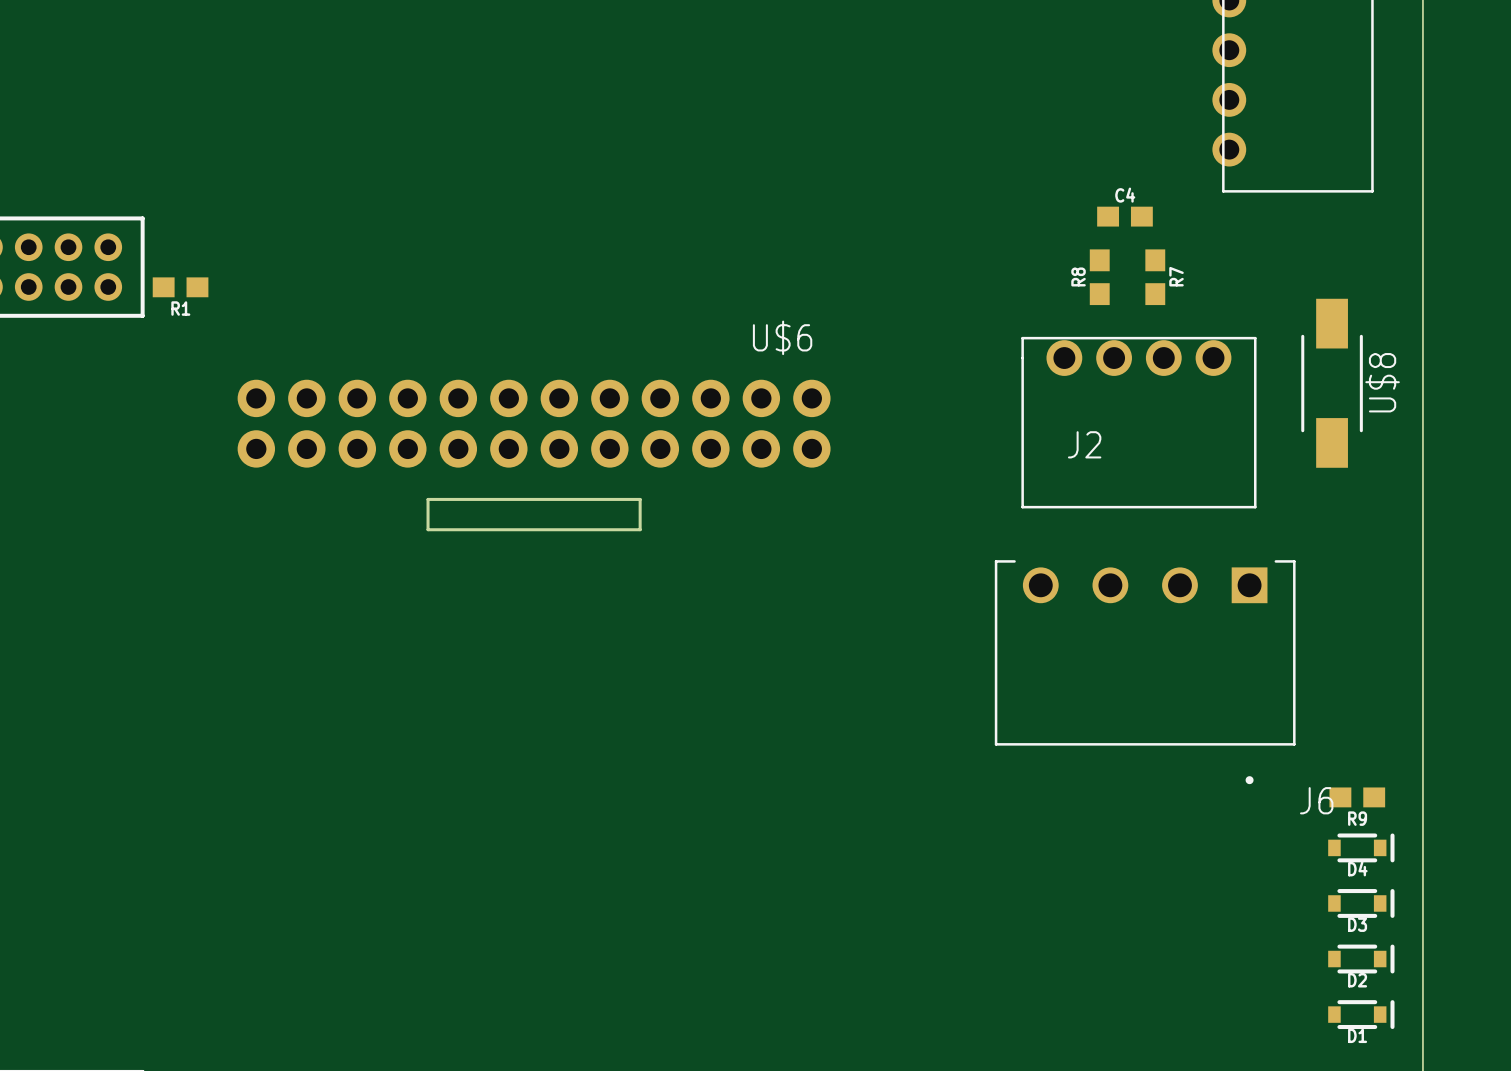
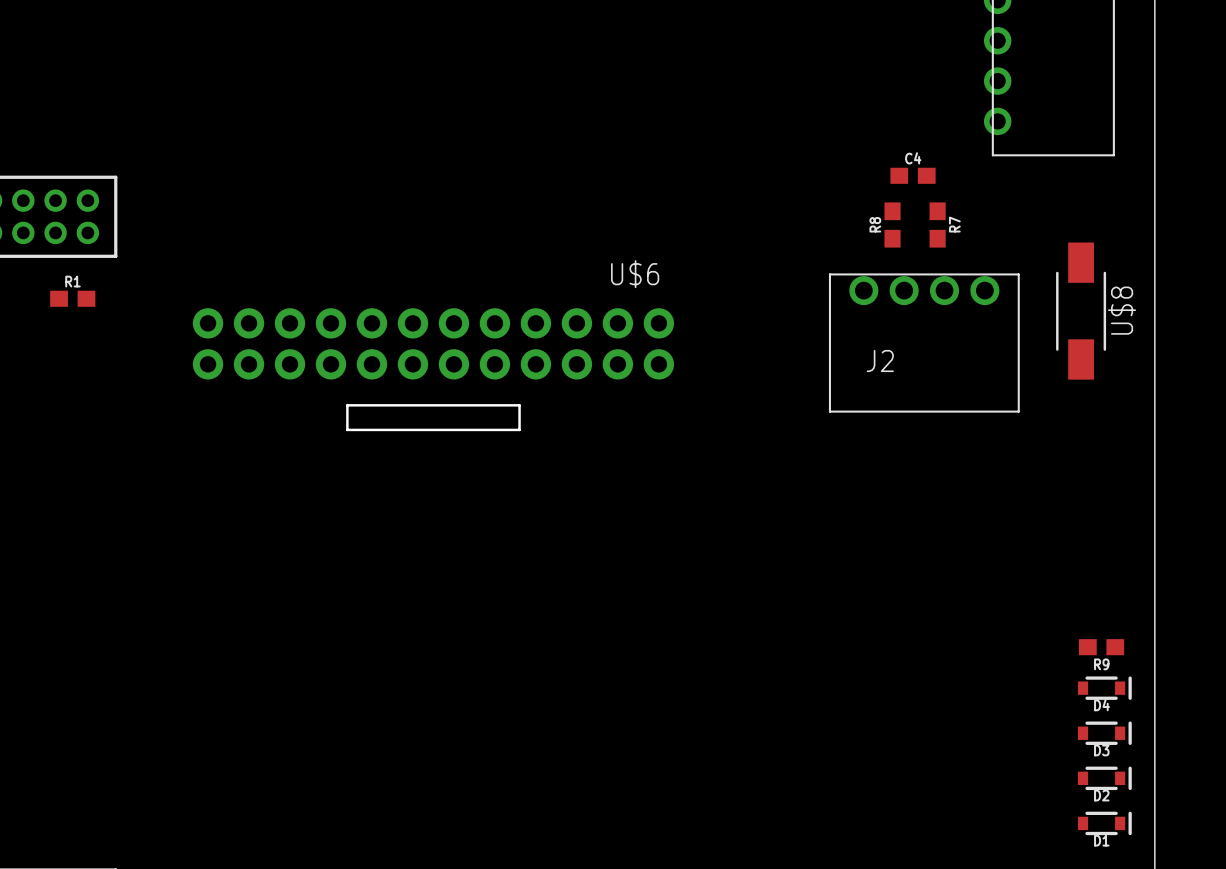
R1 position: (180, 287) -> (72, 298)
R1 name position: R1 (180, 308) -> R1 (72, 281)
J6: (1145, 672) -> none

